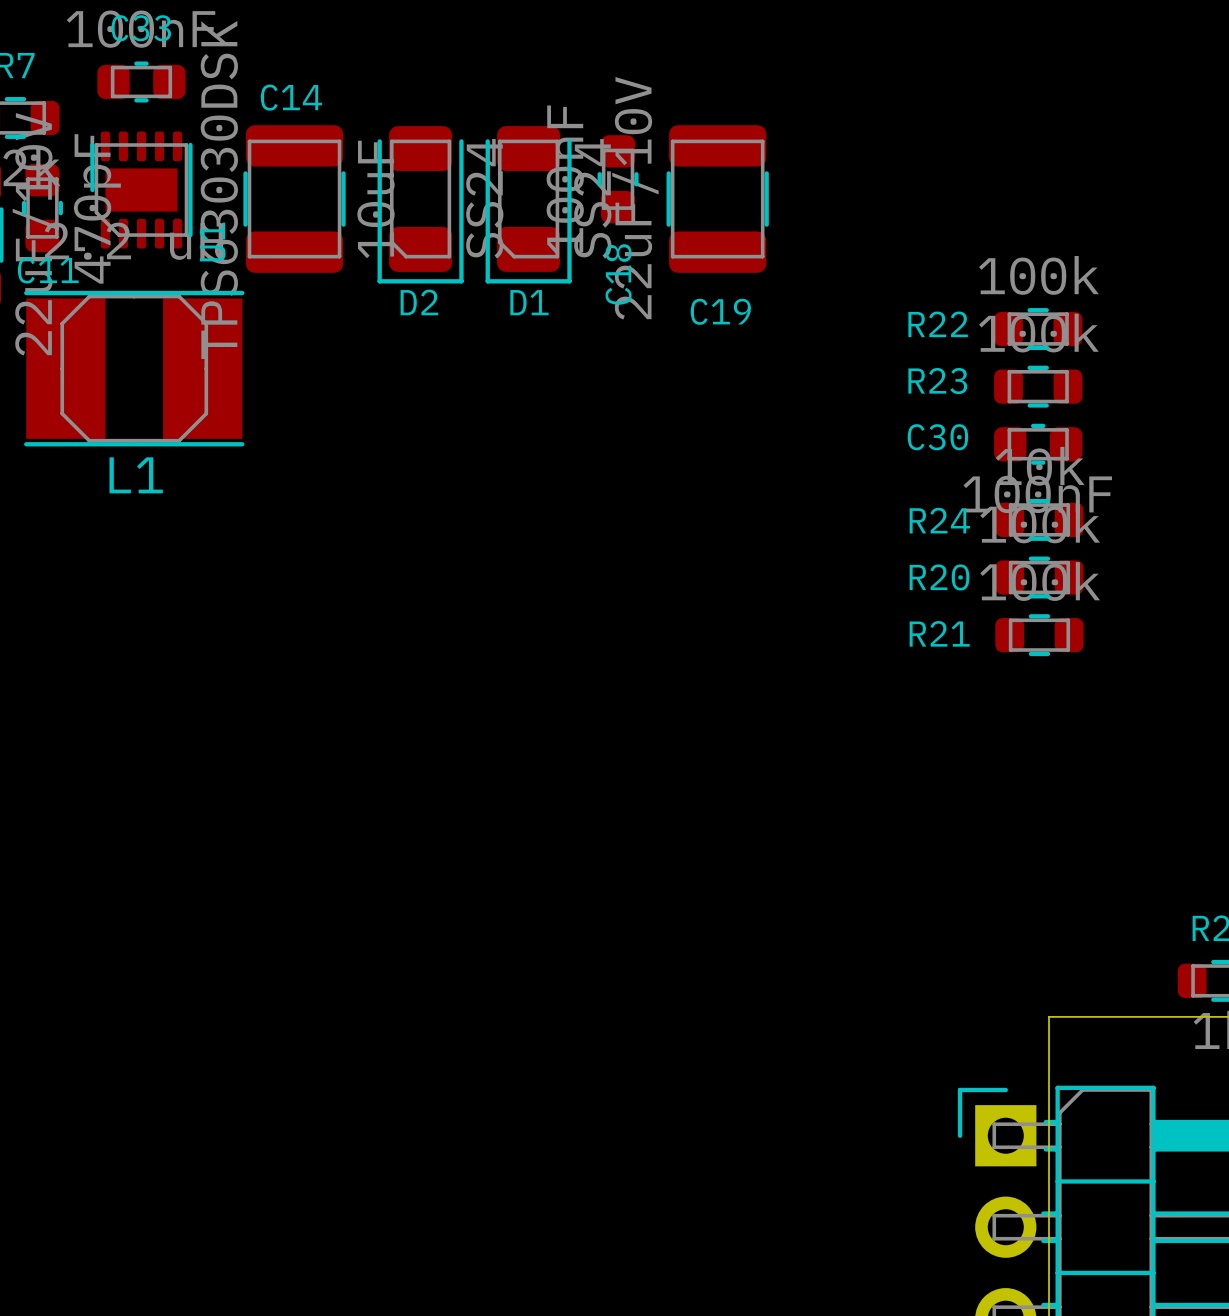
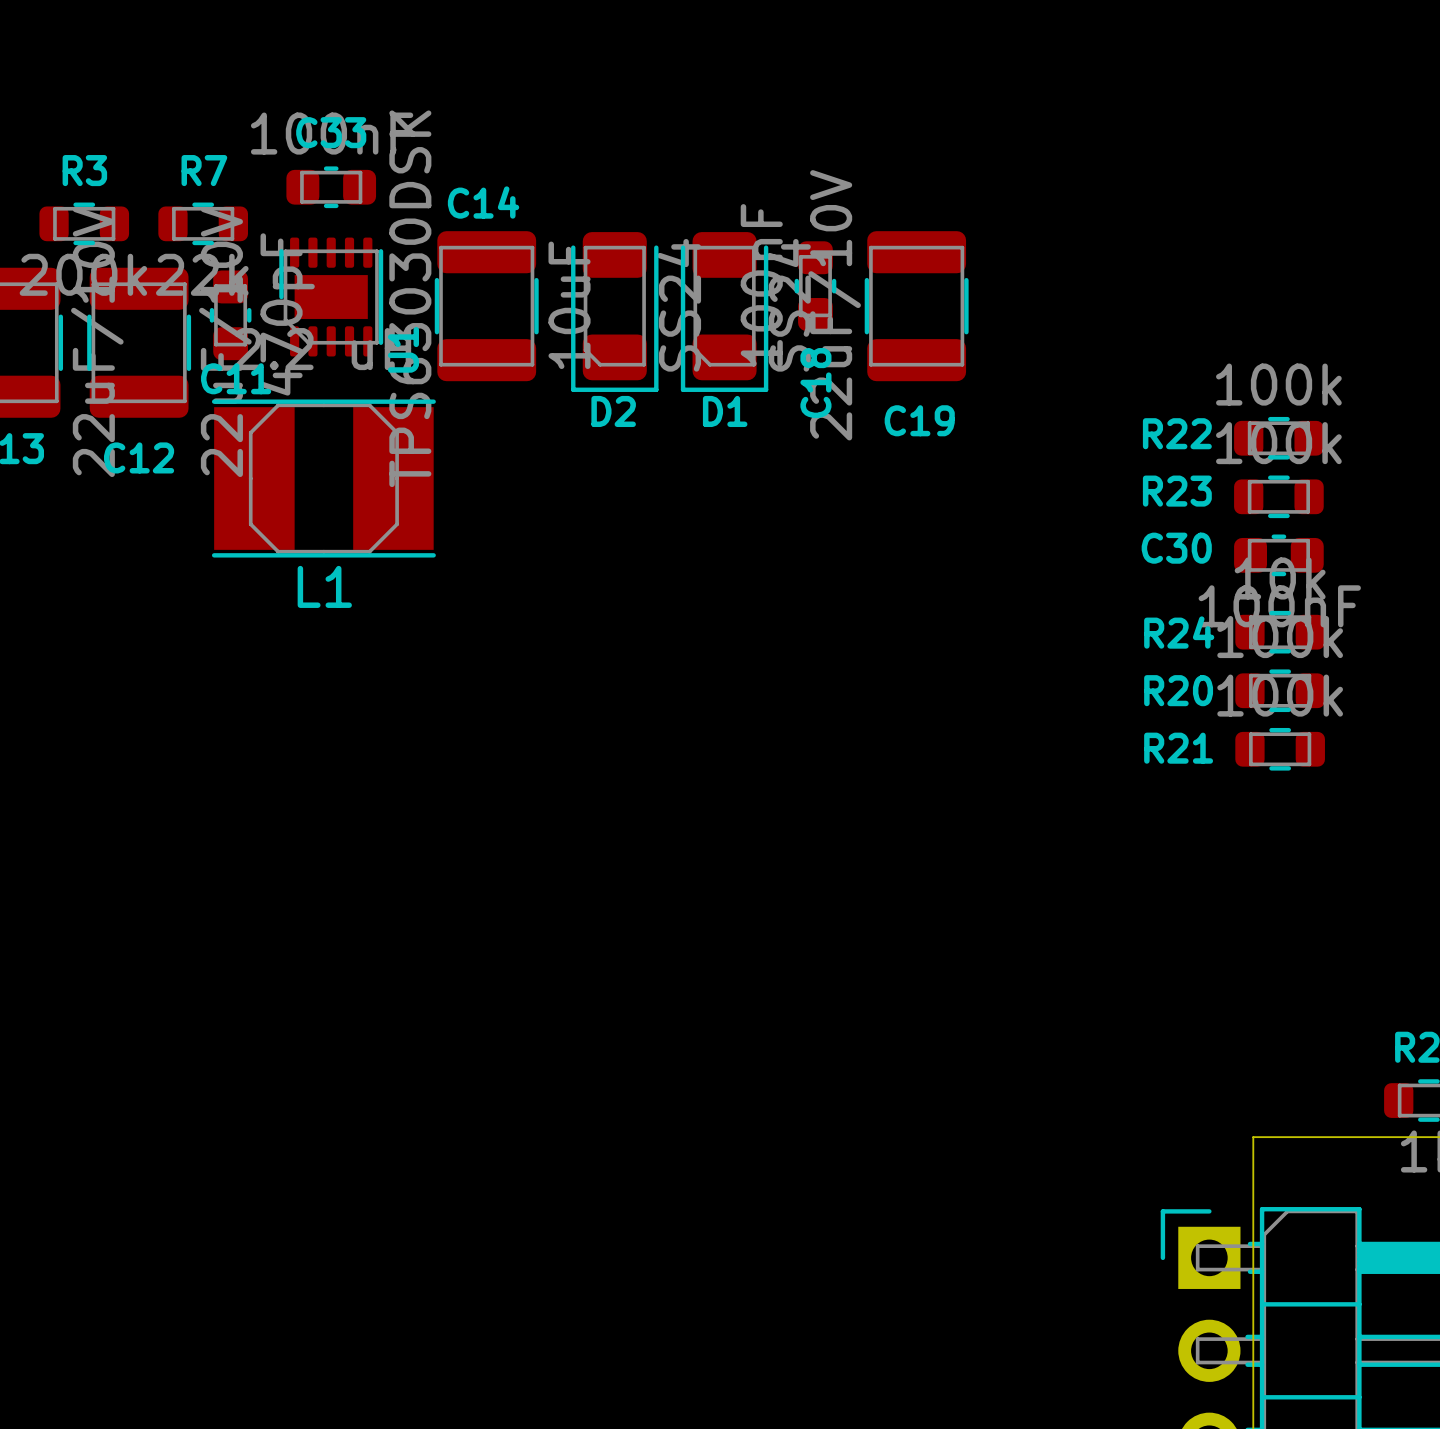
R22 position: (1038, 329) -> (1278, 438)
R23 position: (1038, 386) -> (1278, 496)
C30 position: (1038, 444) -> (1278, 555)
R24 position: (1039, 519) -> (1280, 632)
R20 position: (1039, 577) -> (1280, 690)
R21 position: (1039, 635) -> (1280, 749)

